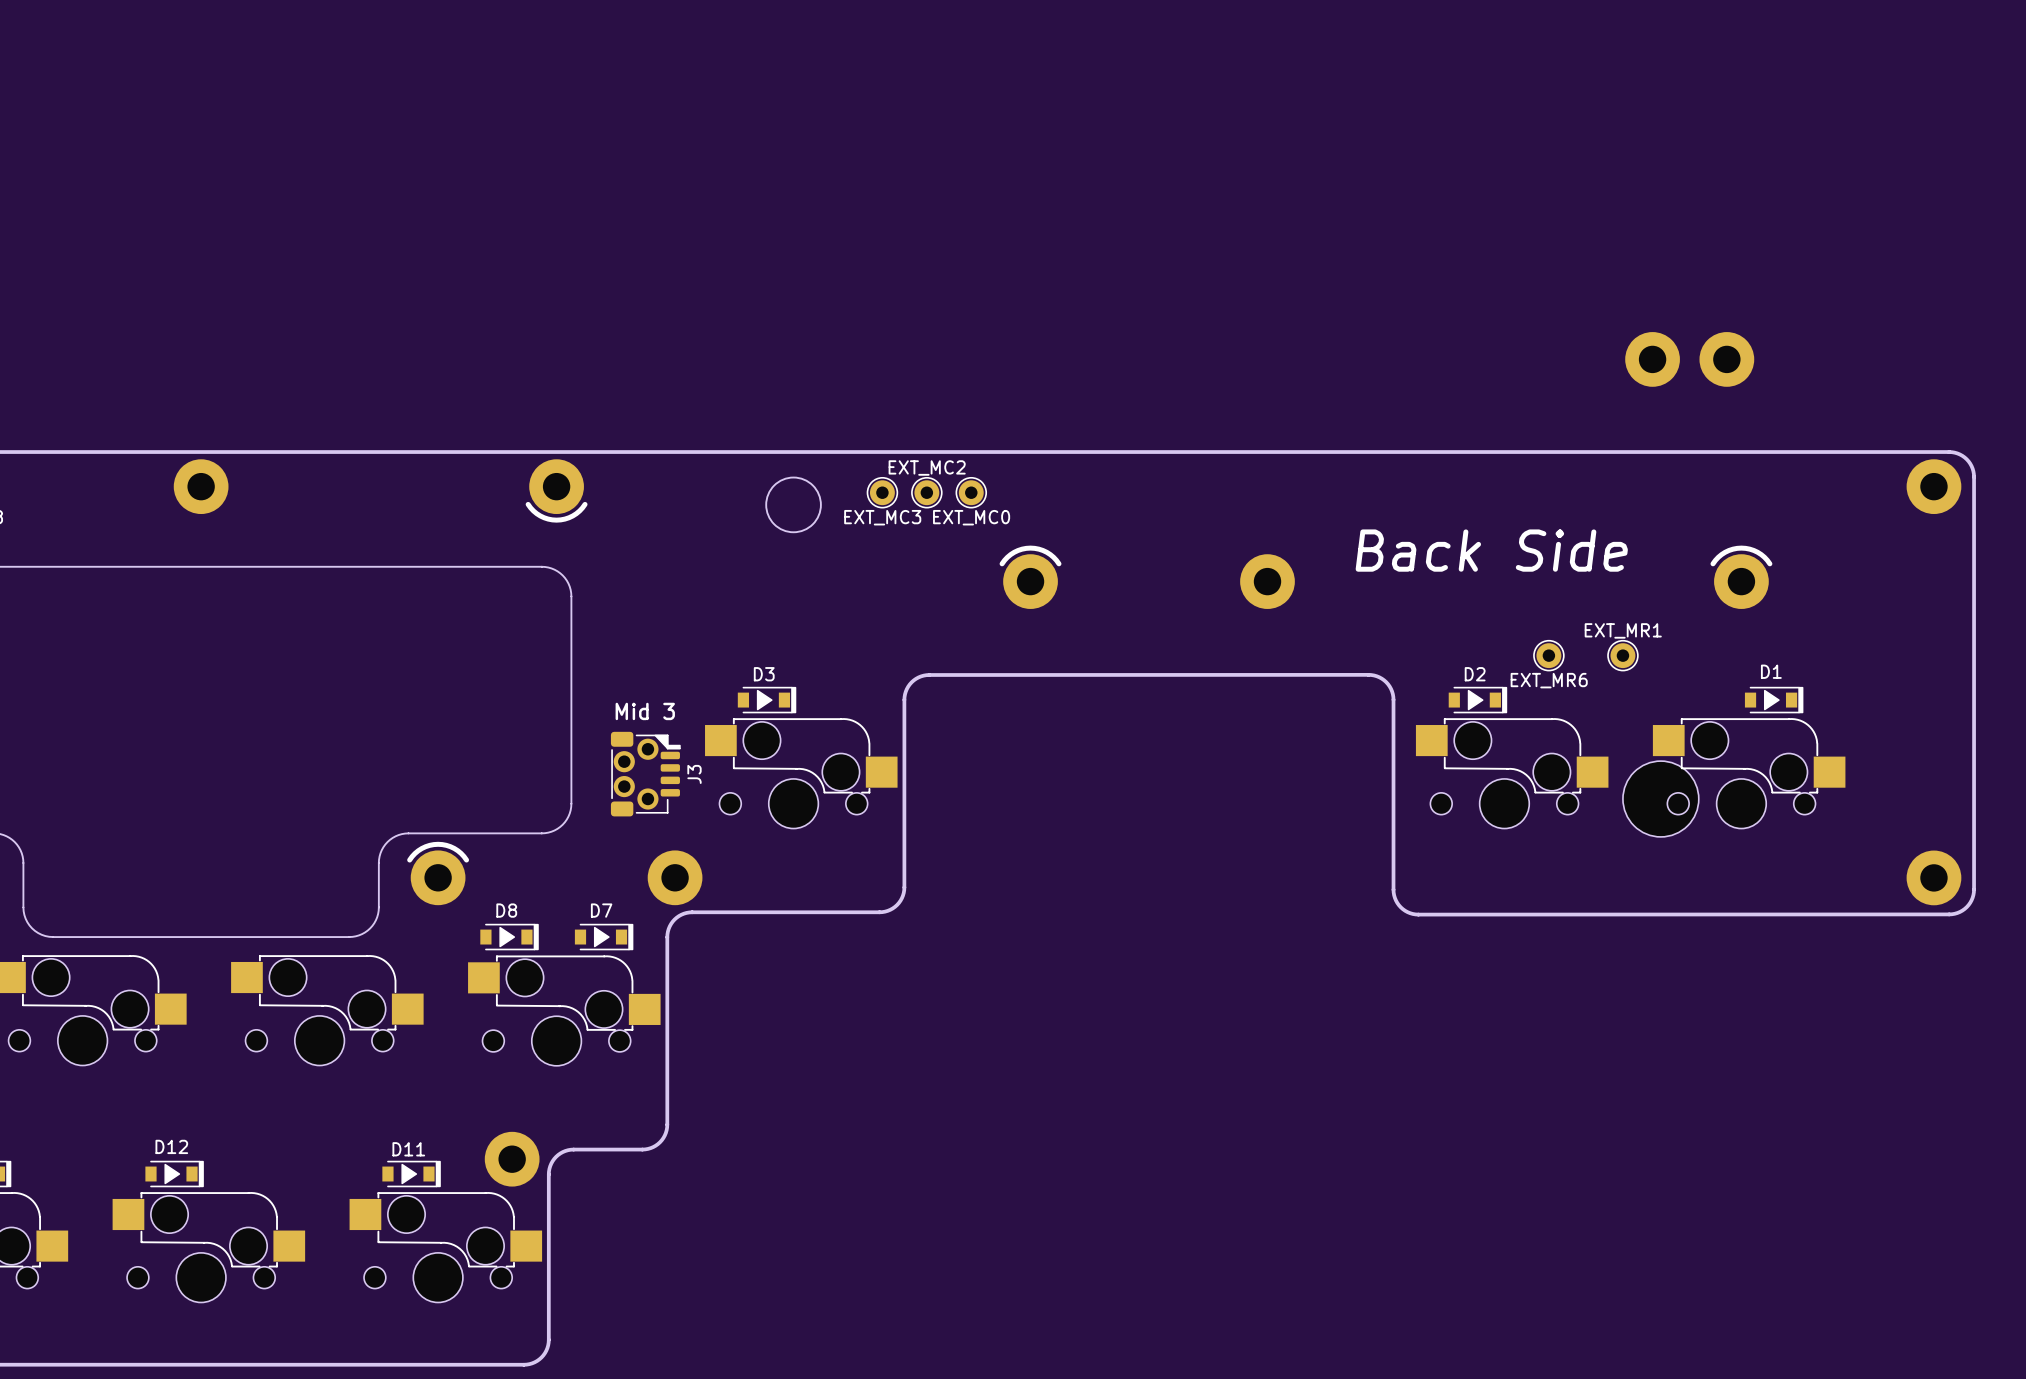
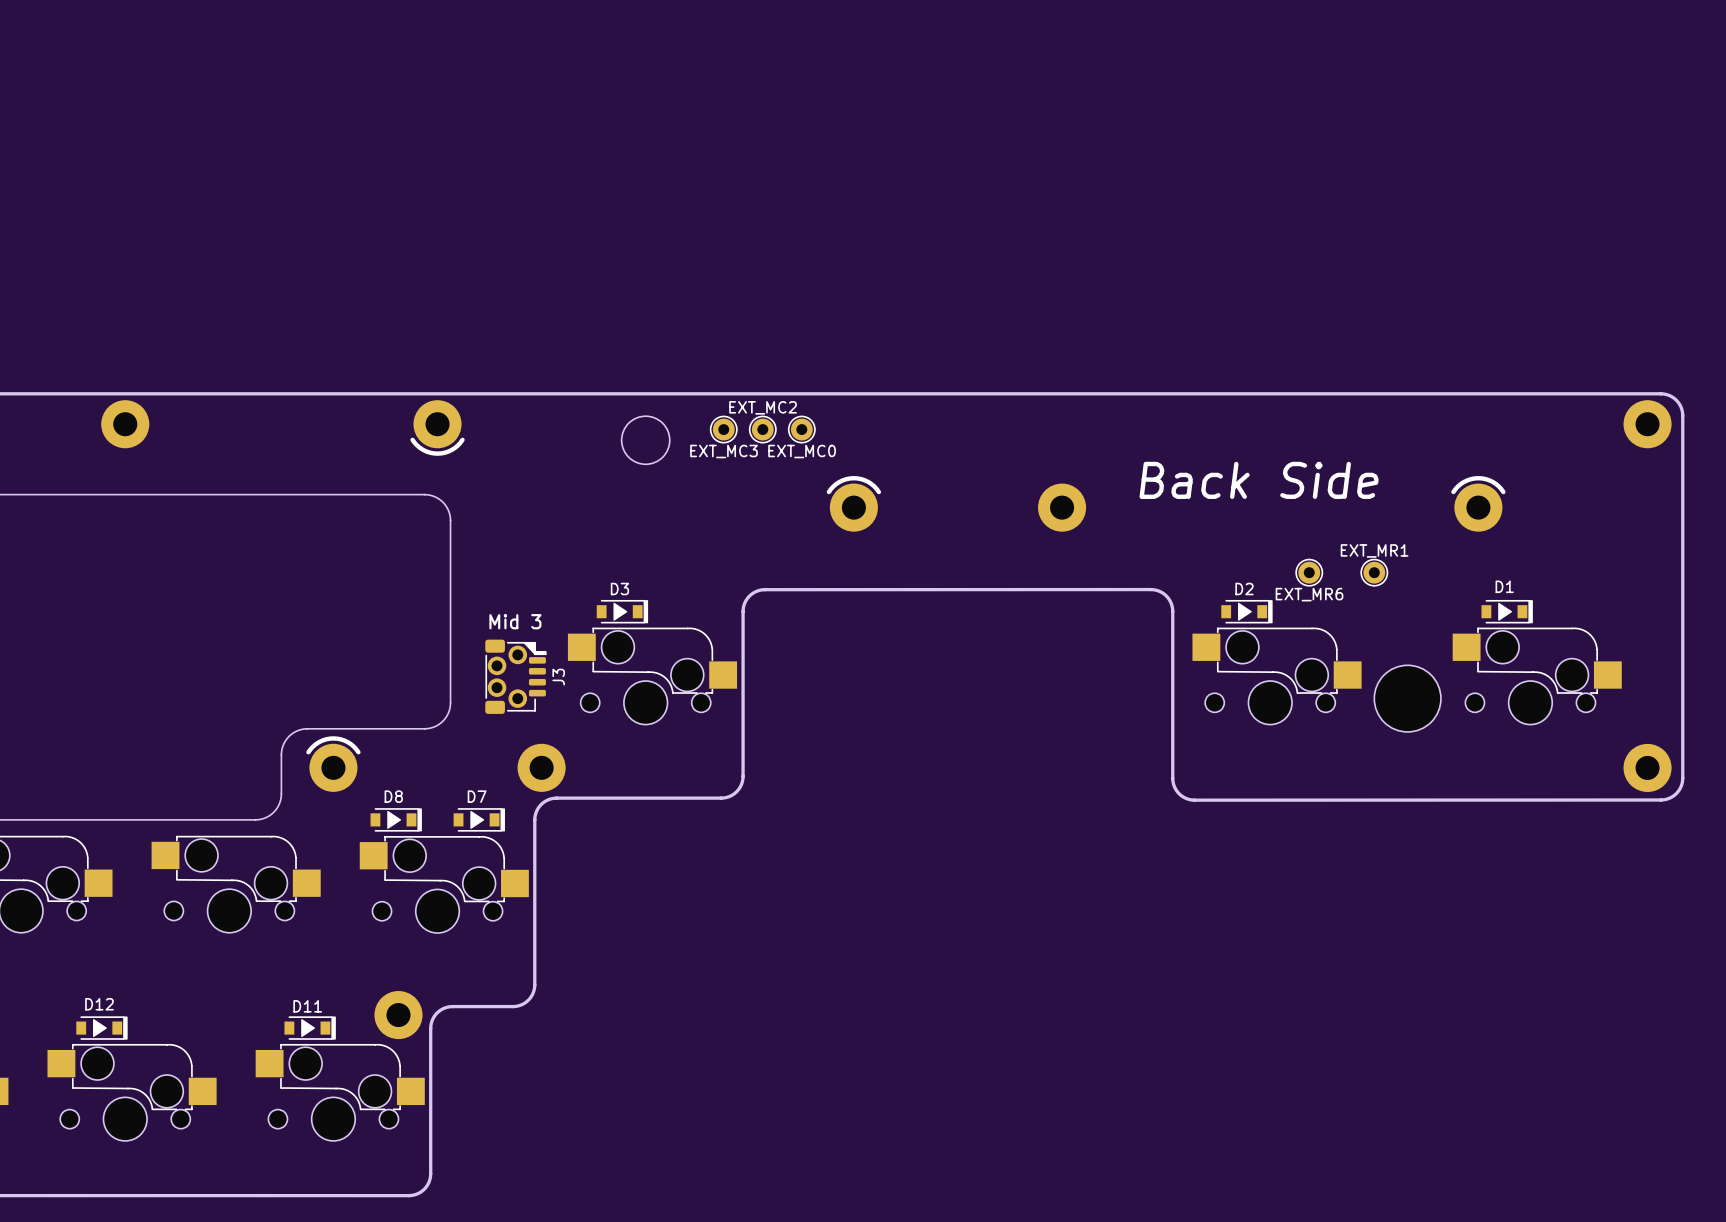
part: (1652, 359) -> none
part: (1726, 359) -> none
part position: (1749, 773) -> (1537, 676)

